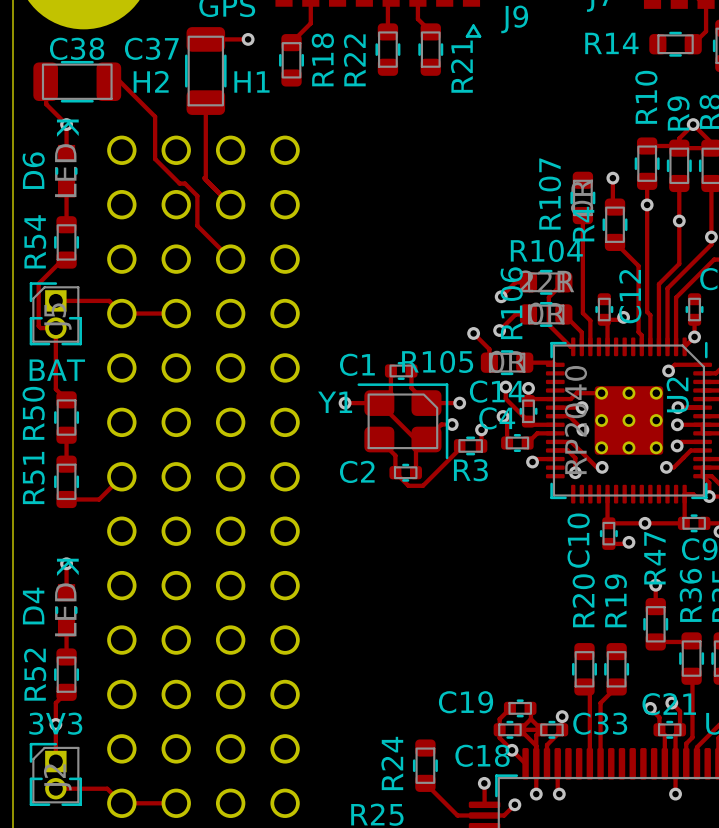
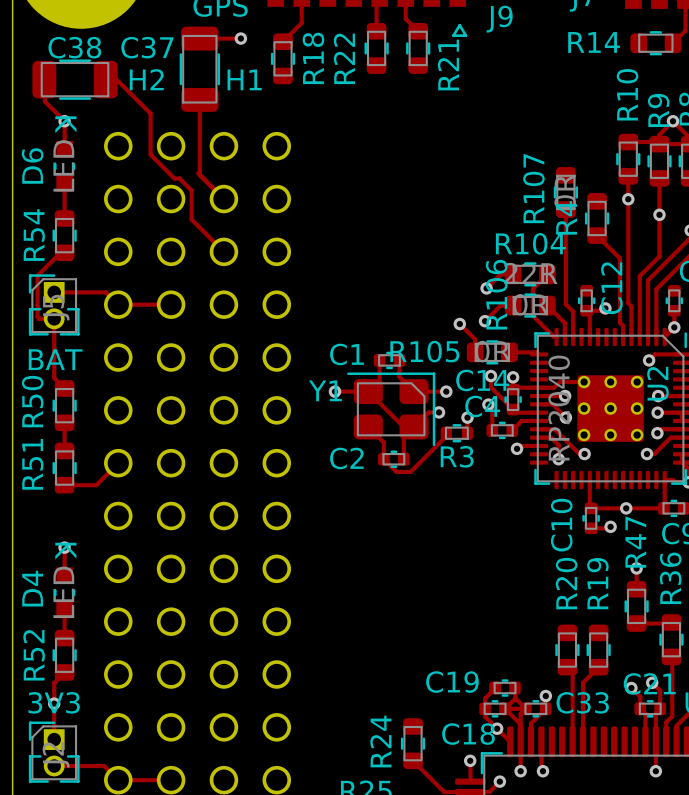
top track: (612, 178) (612, 204) (615, 207) -> none
via: (612, 178) -> none

